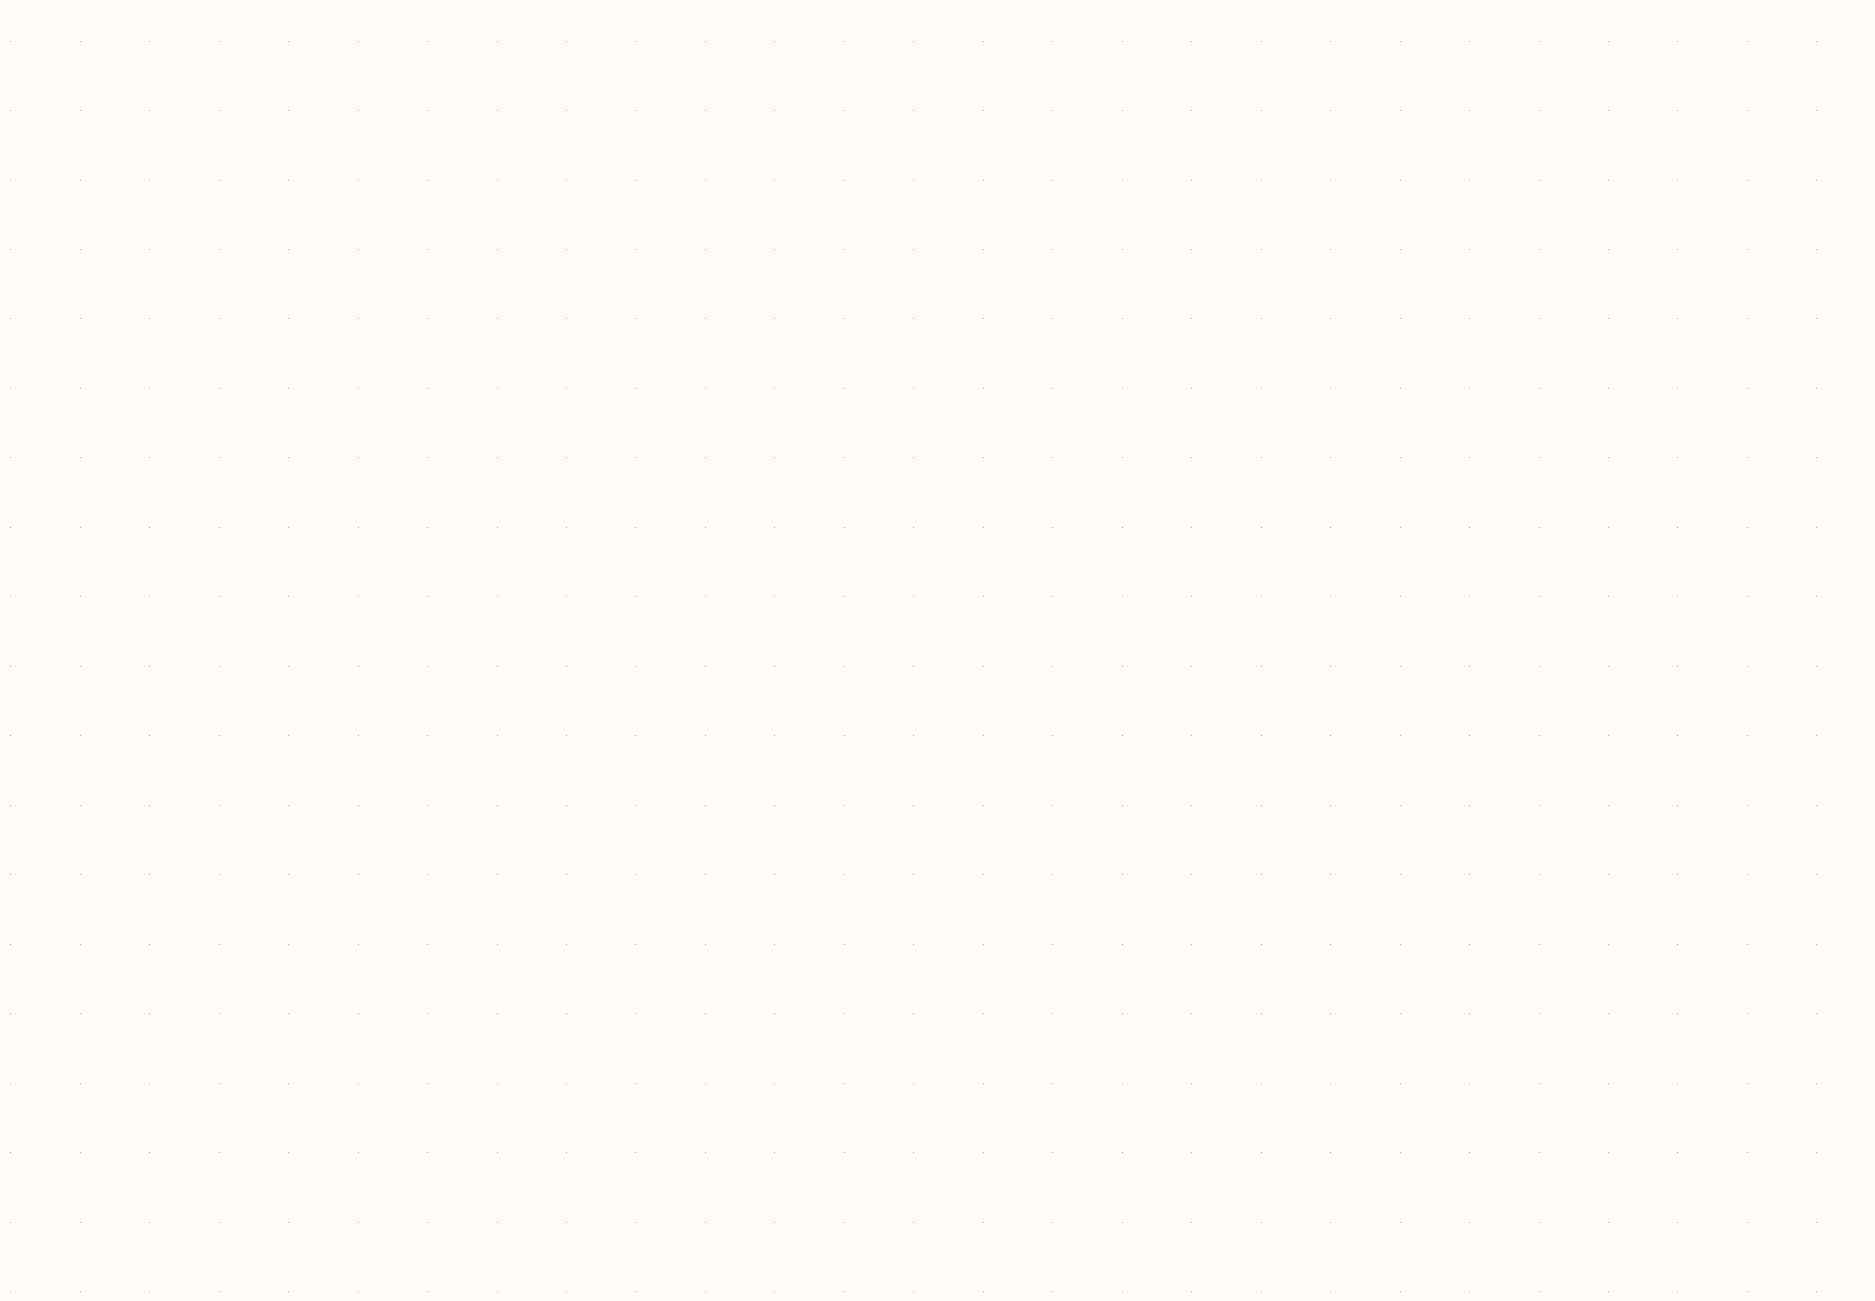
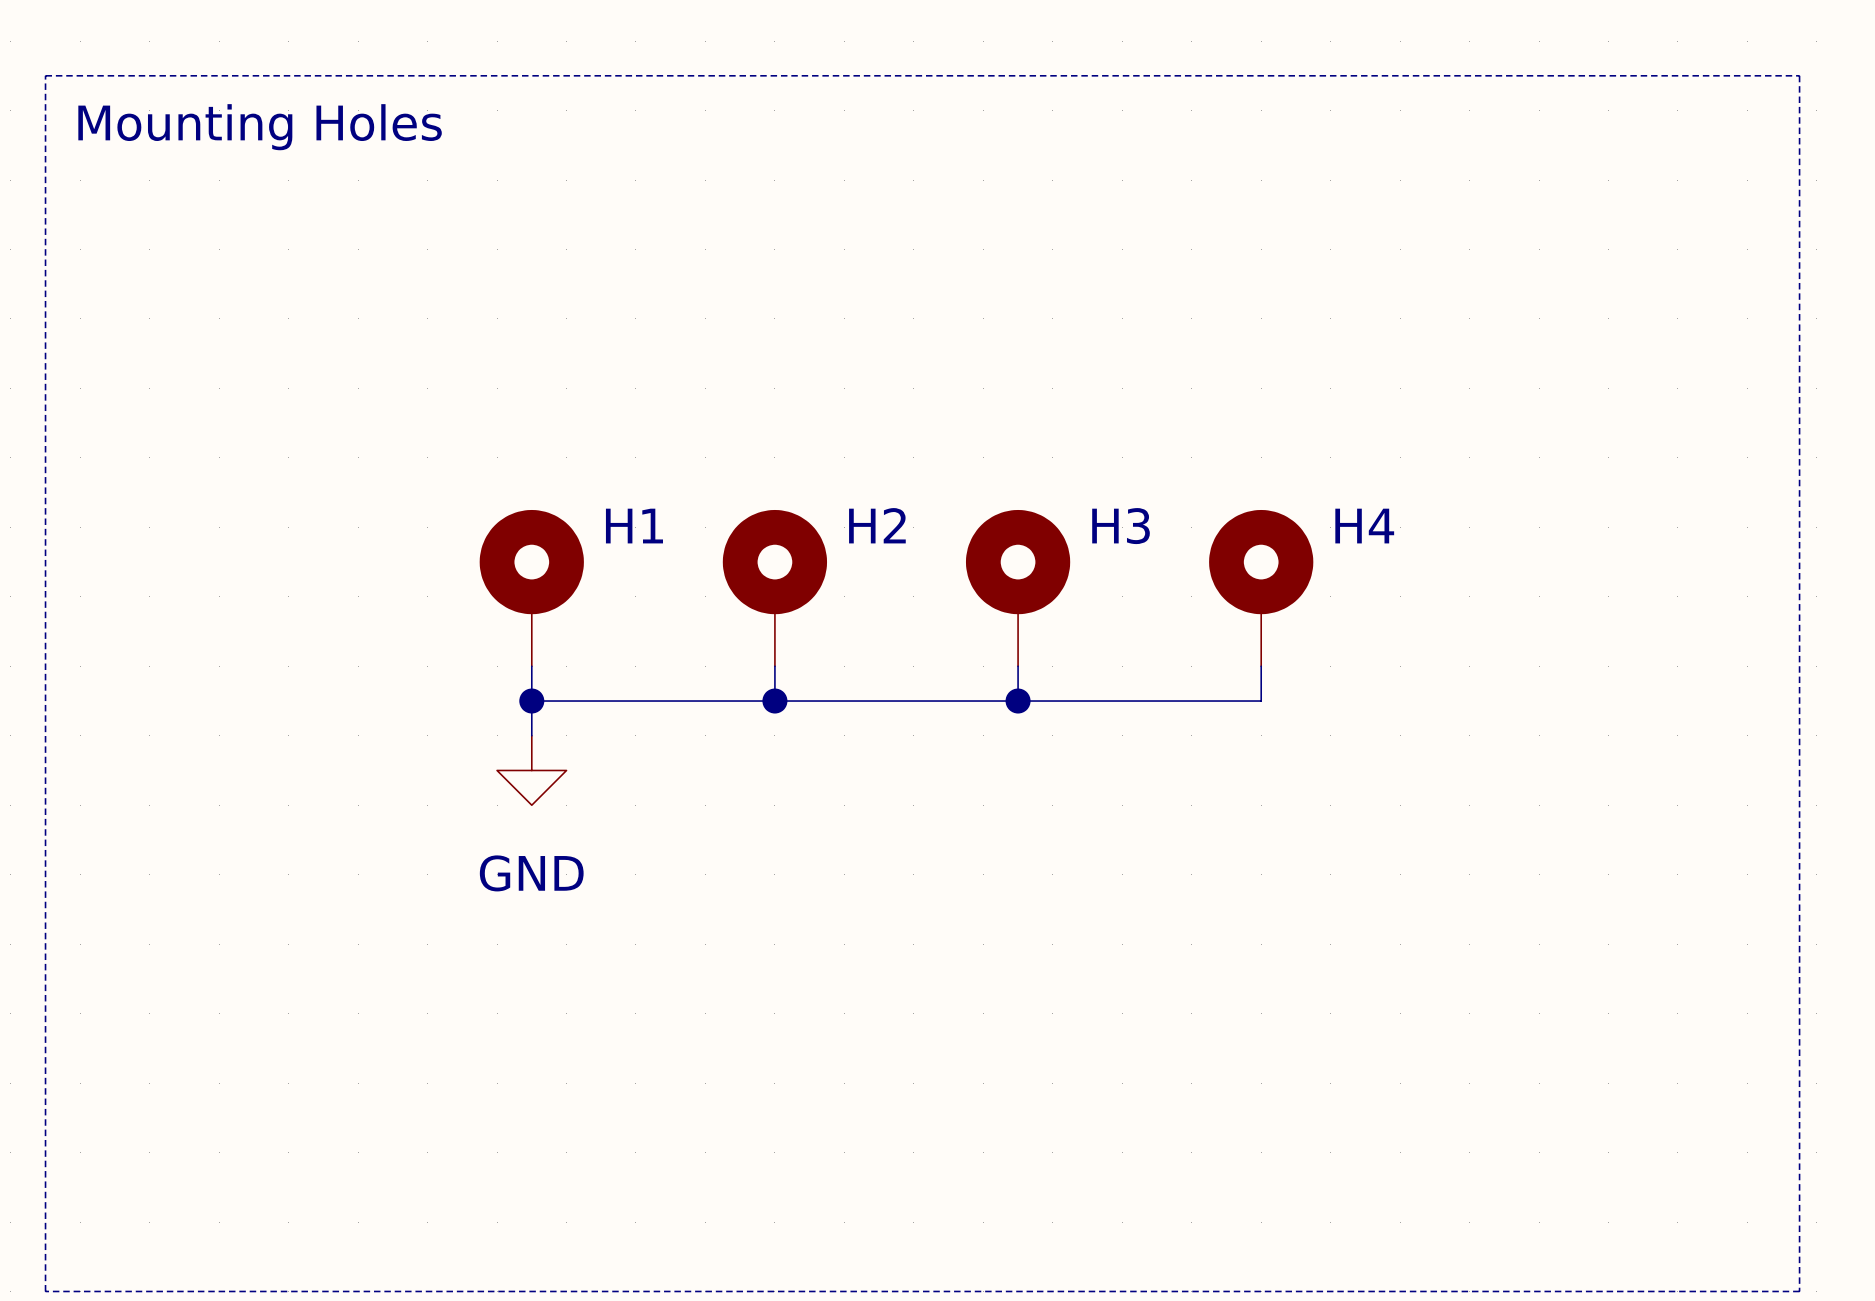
line: none -> (45, 75) (1799, 75) (1799, 1291) (45, 1291) (45, 75)
text: none -> Mounting Holes (260, 127)
H1: none -> (531, 588)
H2: none -> (774, 588)
H3: none -> (1018, 588)
H4: none -> (1261, 588)
wire: none -> (531, 666) (531, 735)
wire: none -> (774, 666) (774, 701)
wire: none -> (1018, 666) (1018, 701)
wire: none -> (1261, 666) (1261, 701) (531, 701)
junction: none -> (531, 701)
junction: none -> (774, 701)
junction: none -> (1018, 701)
power symbol: none -> GND (531, 770)

